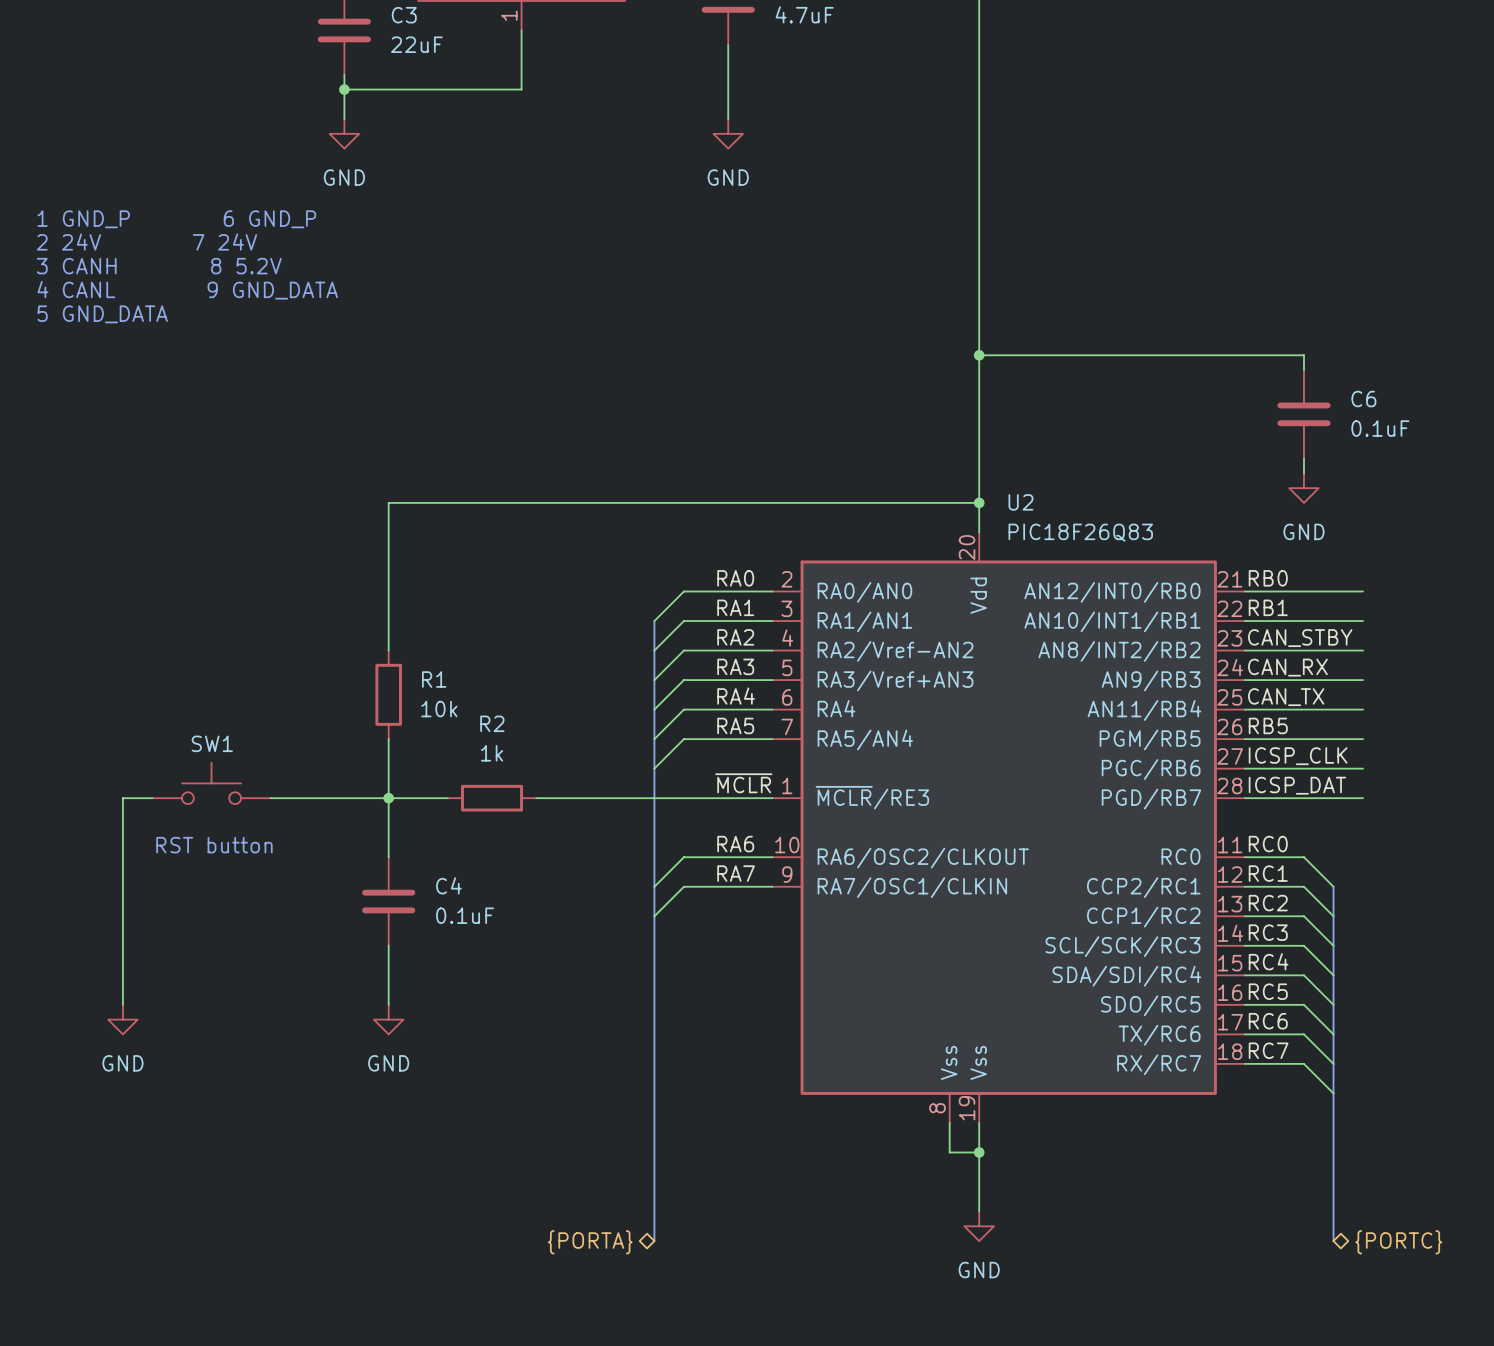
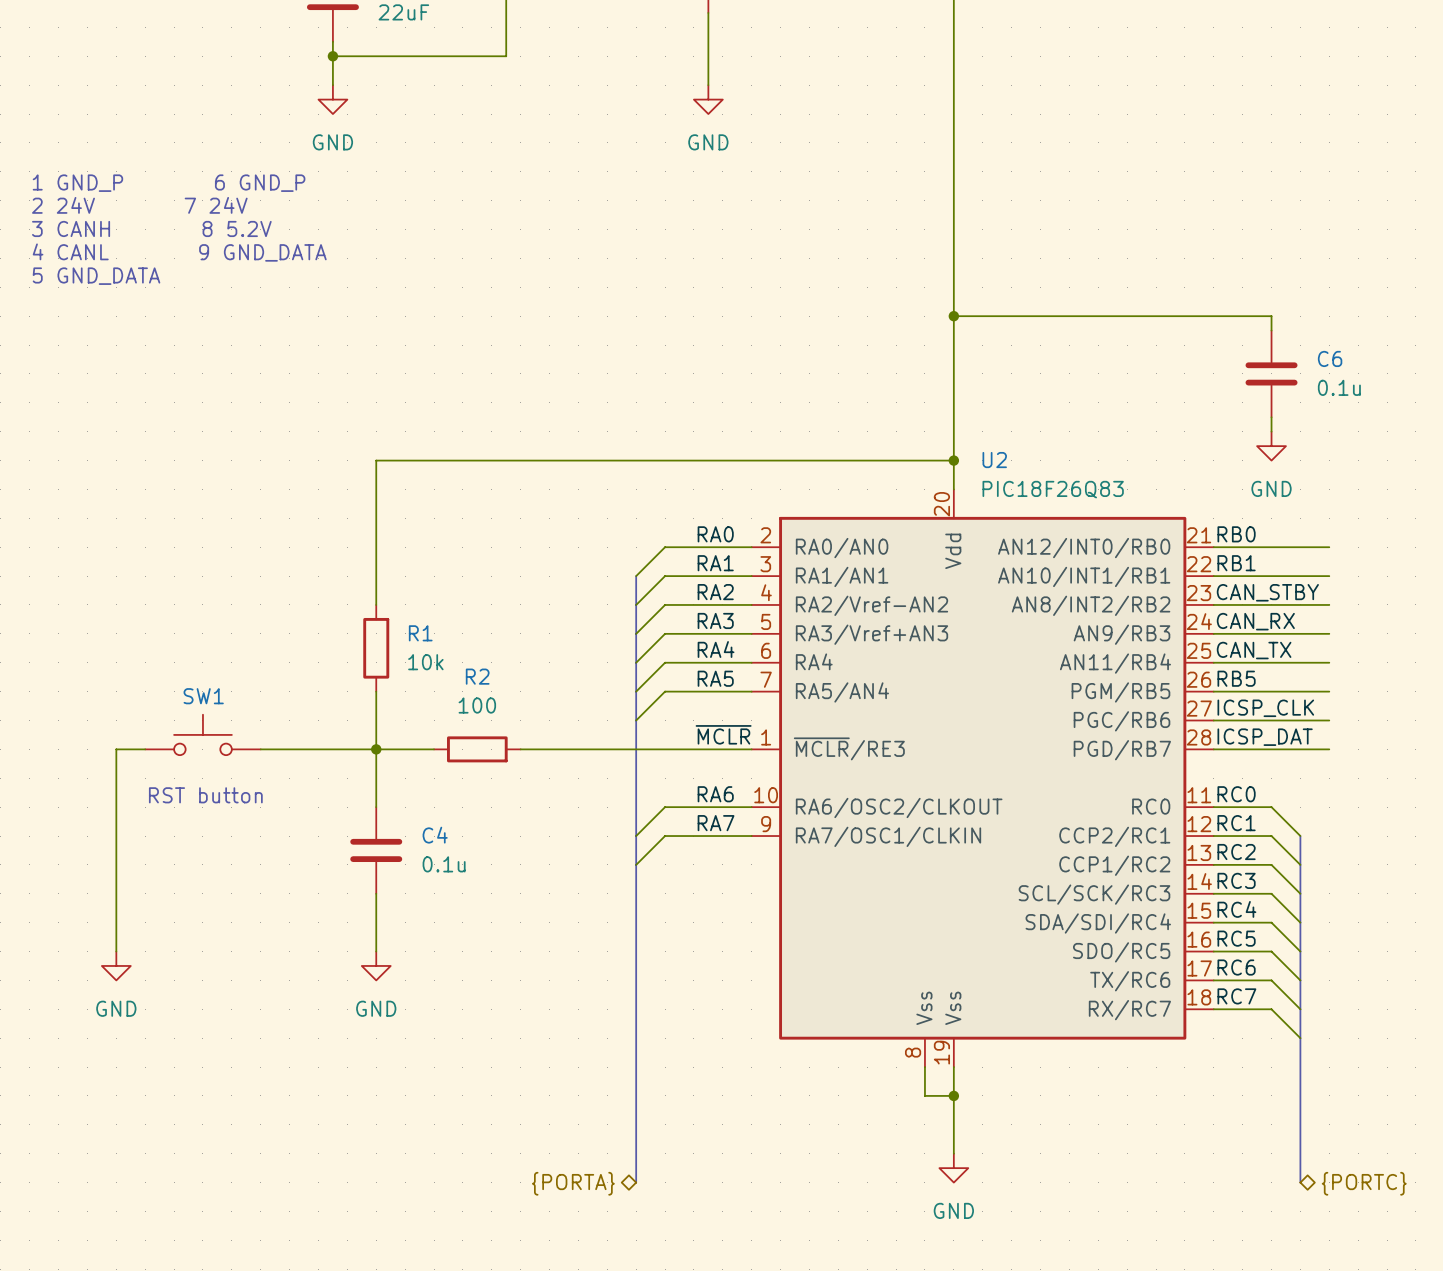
C6 value: 0.1uF (1380, 428) -> 0.1u (1339, 387)
R2 value: 1k (492, 753) -> 100 (477, 705)
C4 value: 0.1uF (465, 915) -> 0.1u (444, 864)

